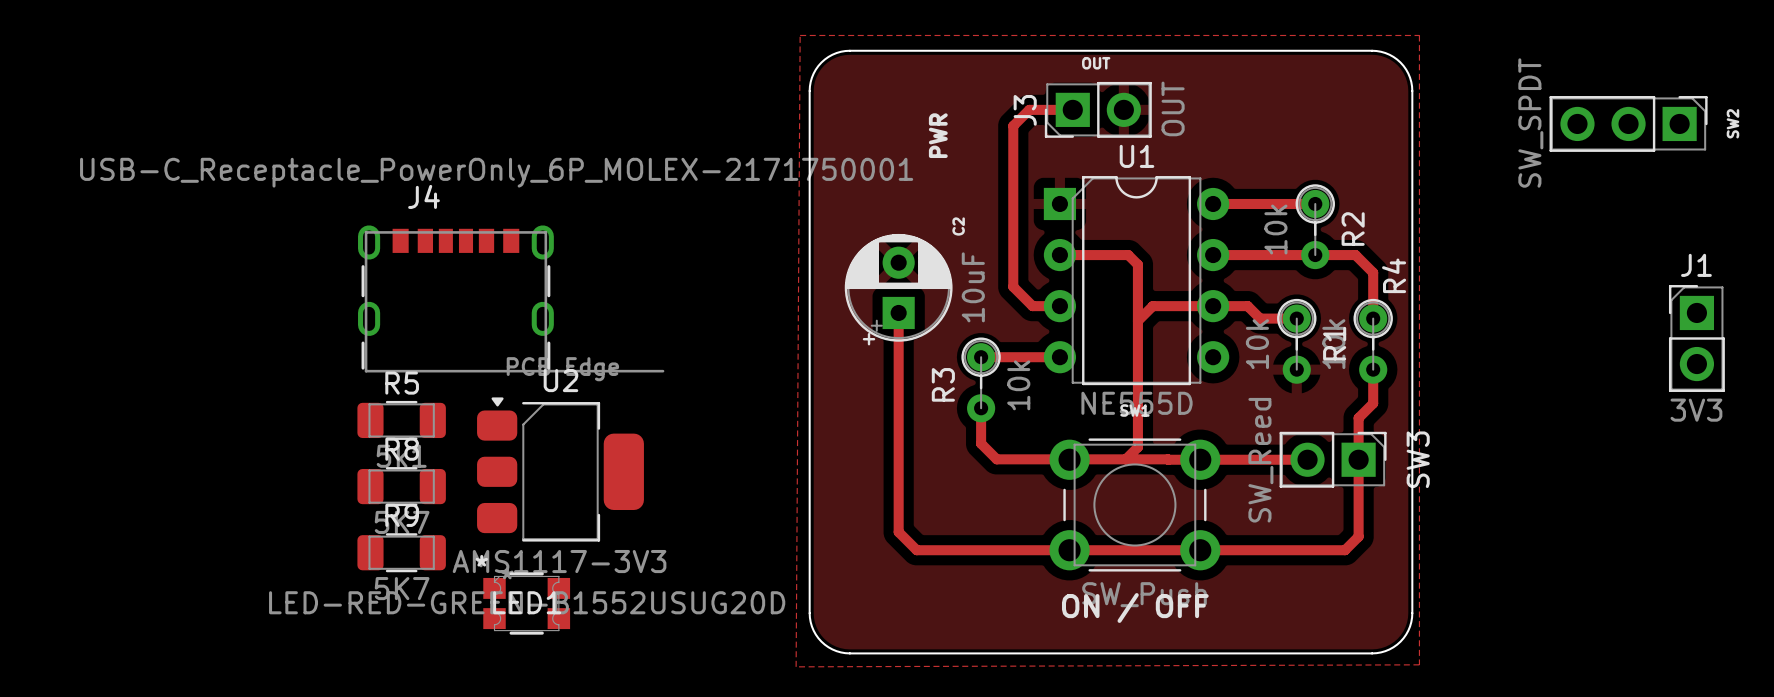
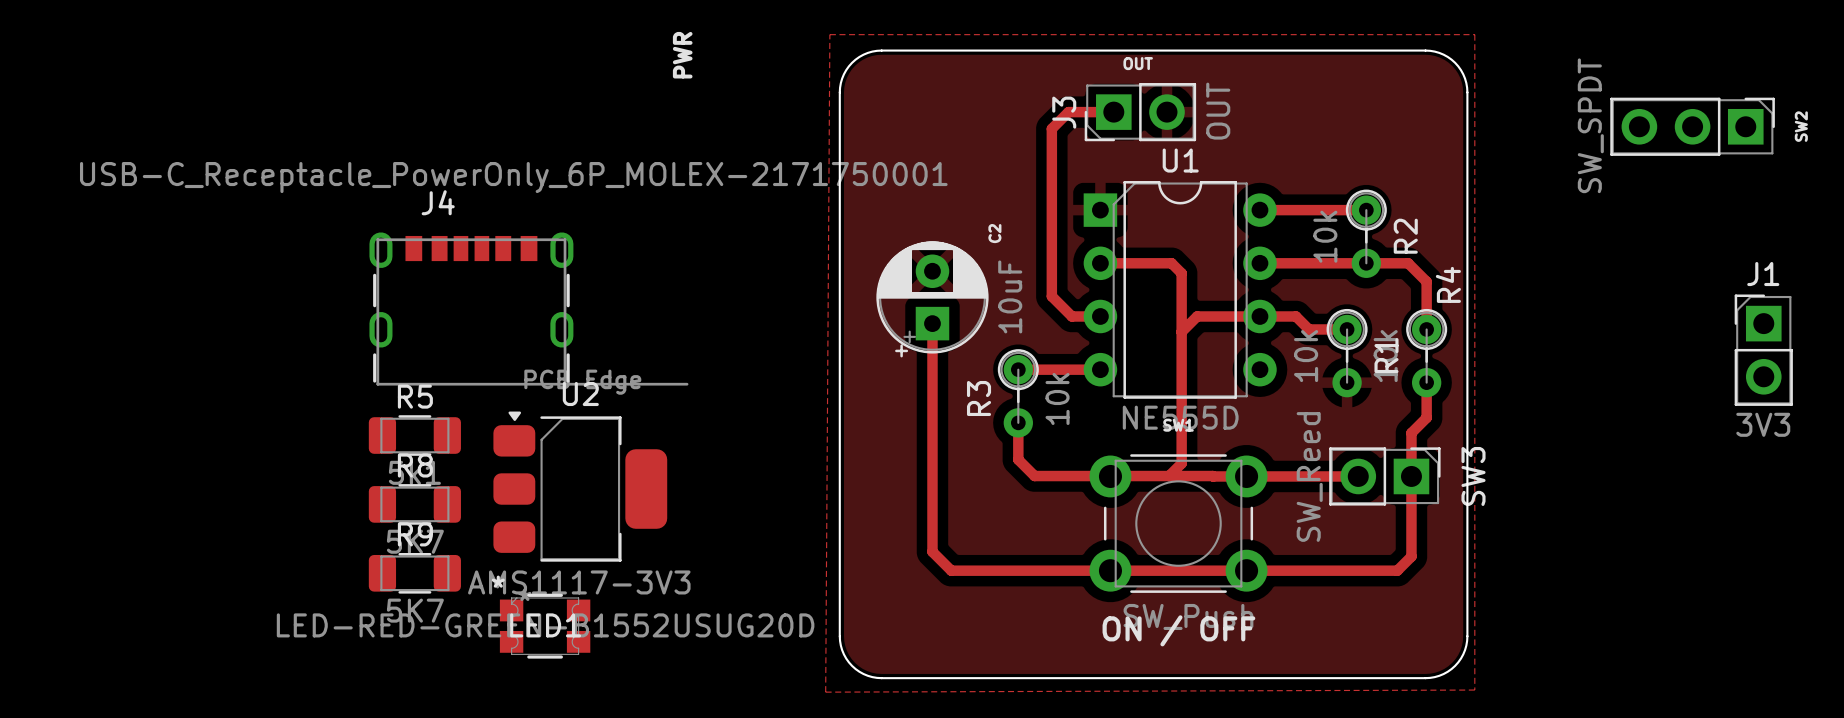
text position: PWR (938, 135) -> PWR (682, 55)

